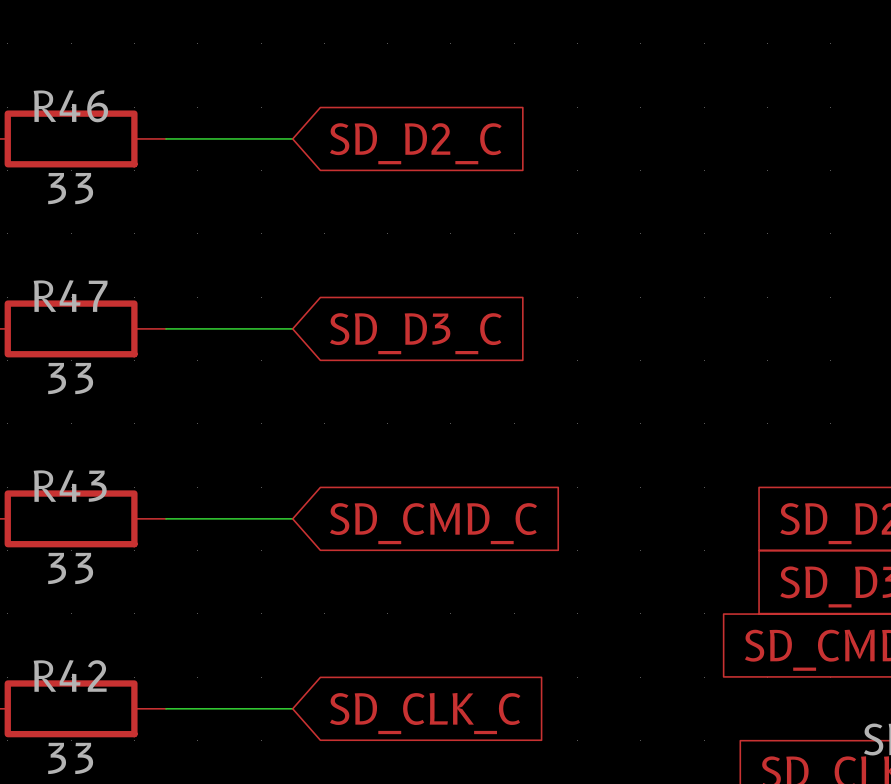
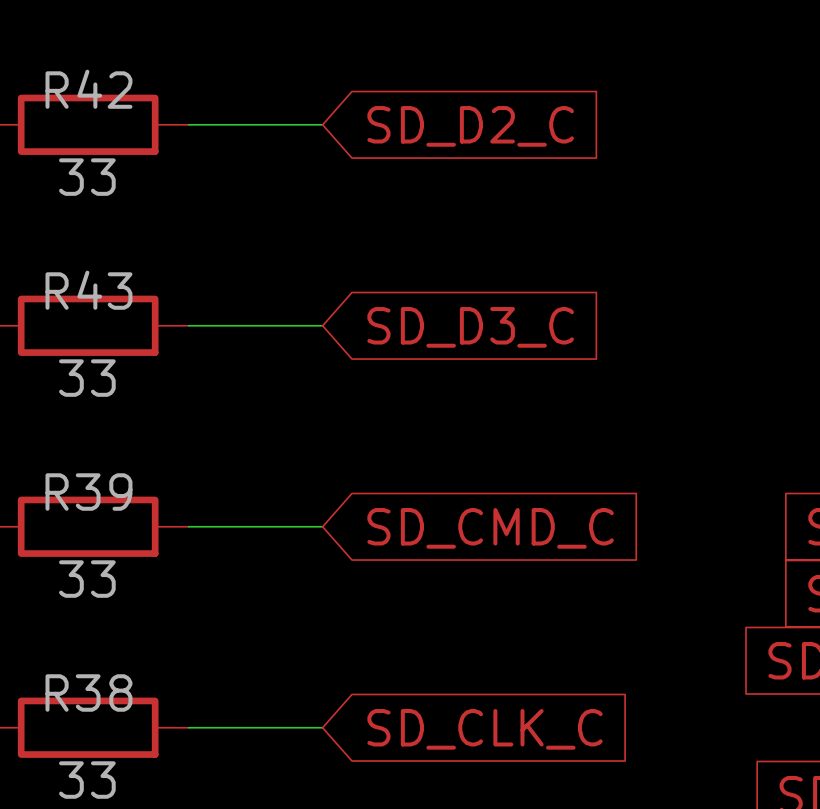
R46 name: R46 (70, 106) -> R42 (88, 89)
R47 name: R47 (70, 296) -> R43 (88, 290)
R43 name: R43 (70, 486) -> R39 (88, 492)
R42 name: R42 (70, 675) -> R38 (88, 692)

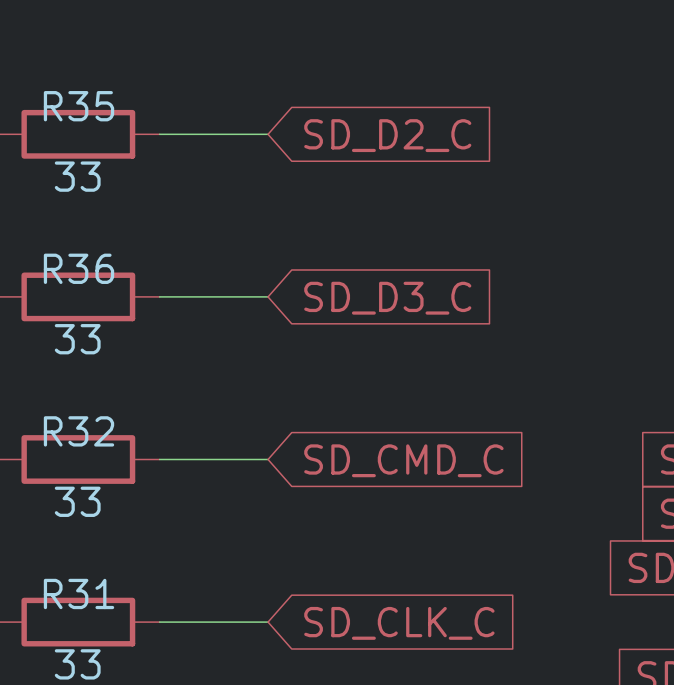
R42 name: R42 (88, 89) -> R35 (78, 106)
R43 name: R43 (88, 290) -> R36 (78, 268)
R39 name: R39 (88, 492) -> R32 (78, 431)
R38 name: R38 (88, 692) -> R31 (78, 593)

